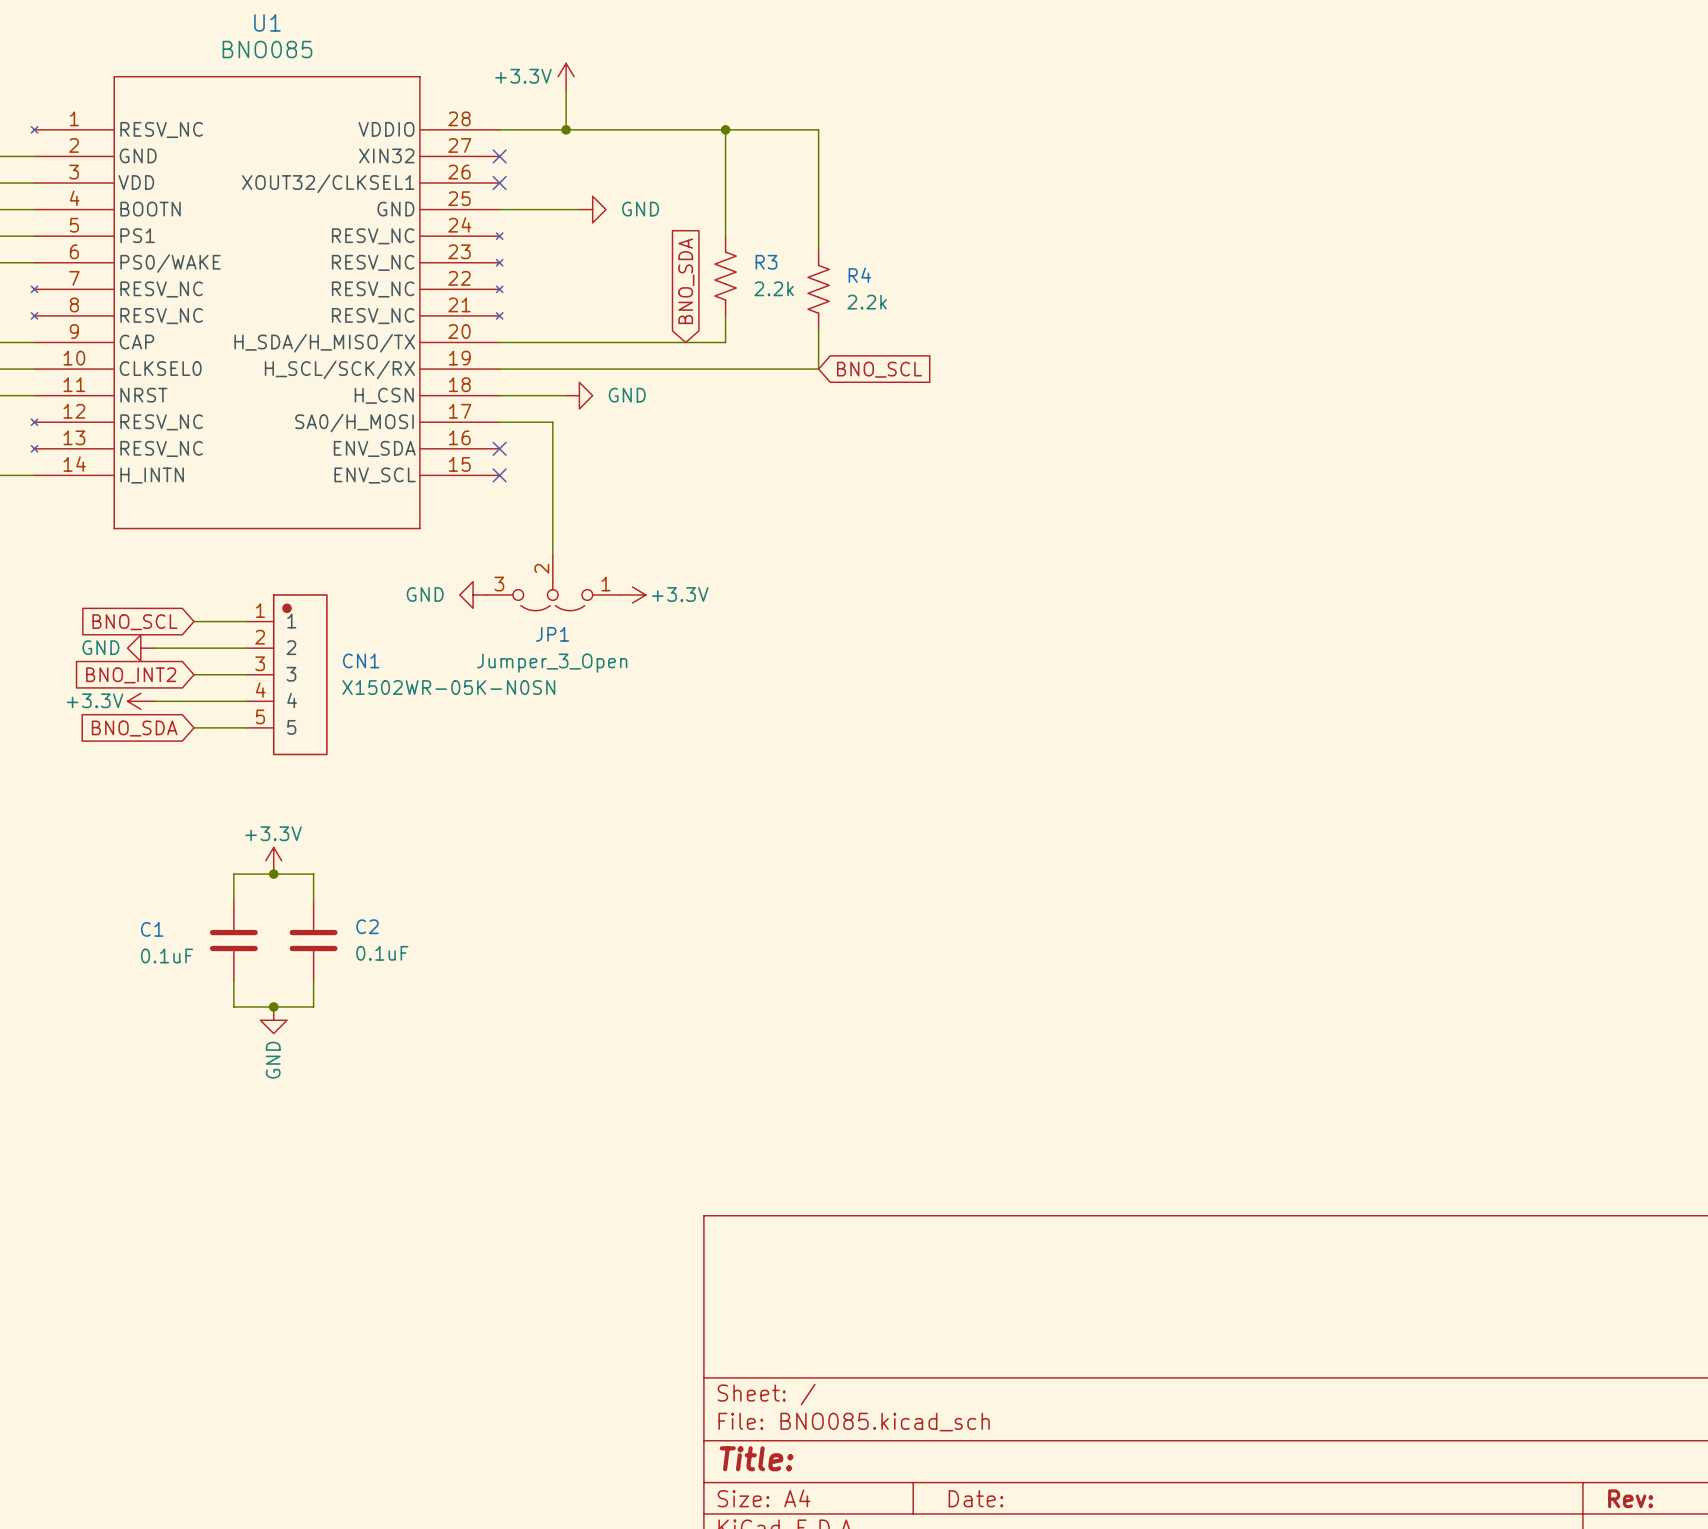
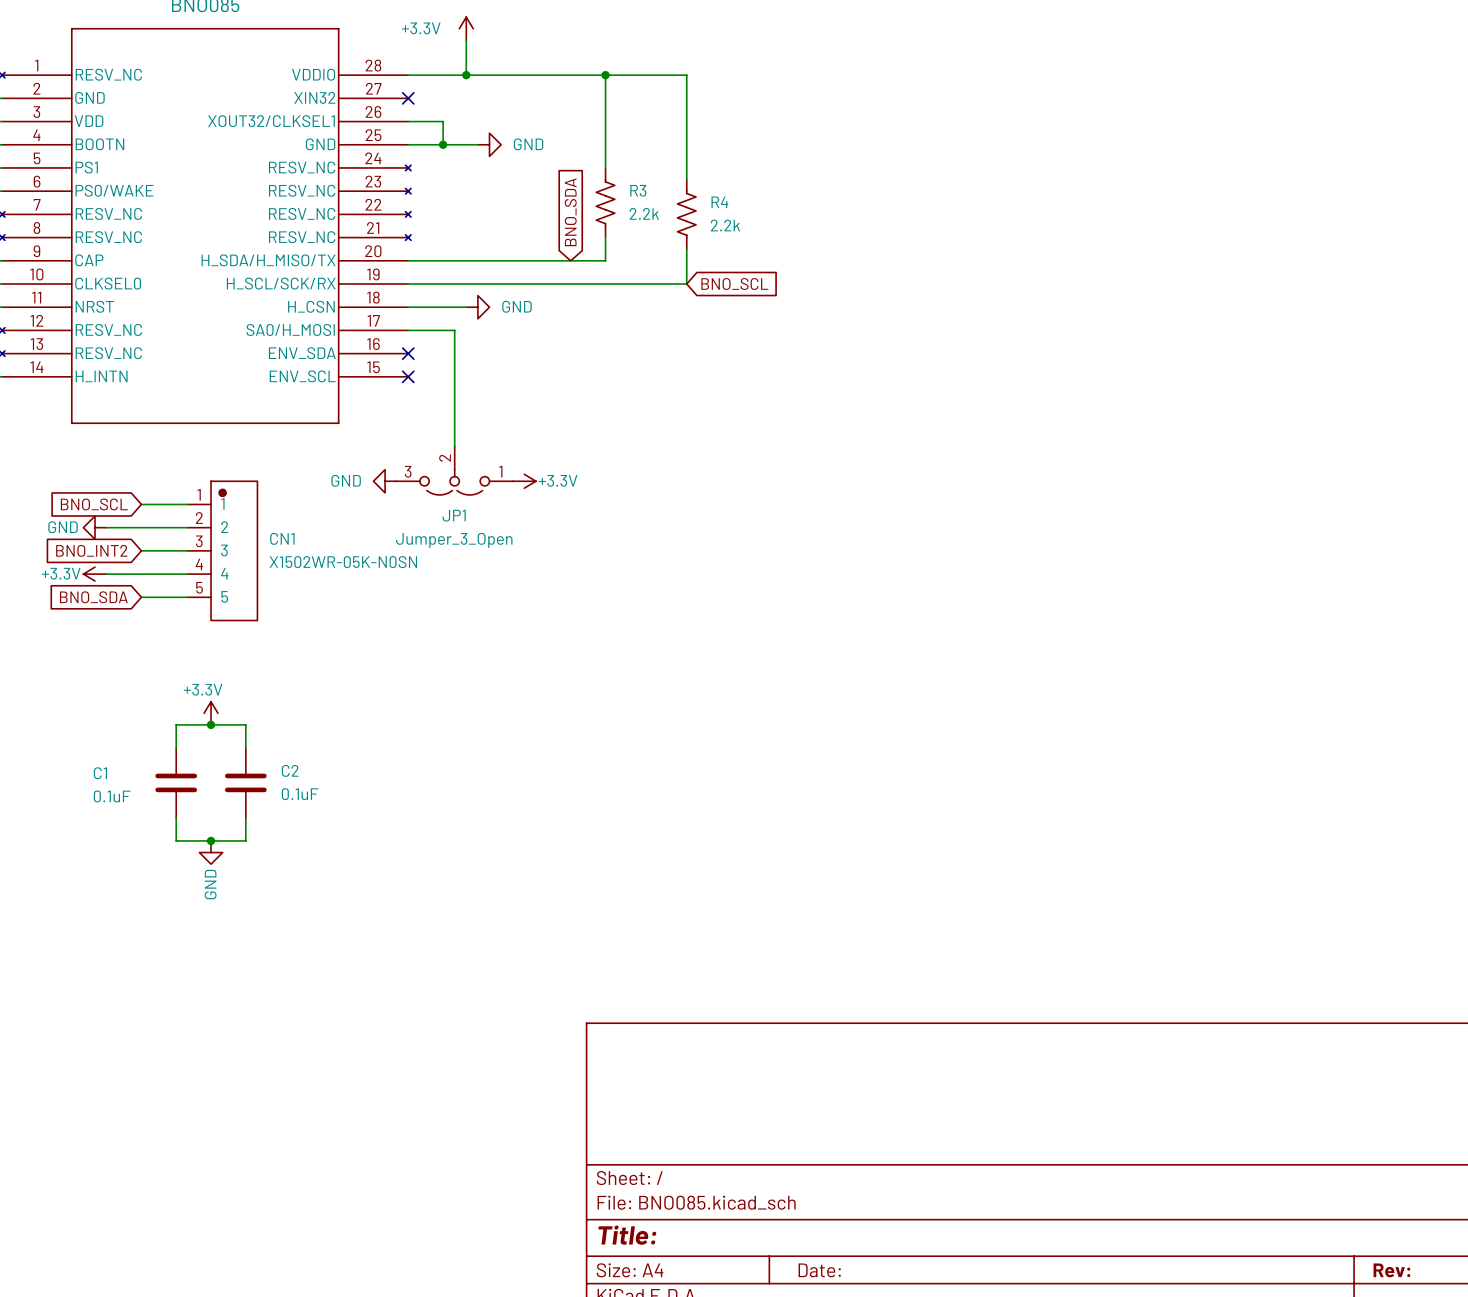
wire: none -> (408, 121) (443, 121) (443, 144)
no-connect mark: (499, 183) -> none
junction: none -> (443, 144)

